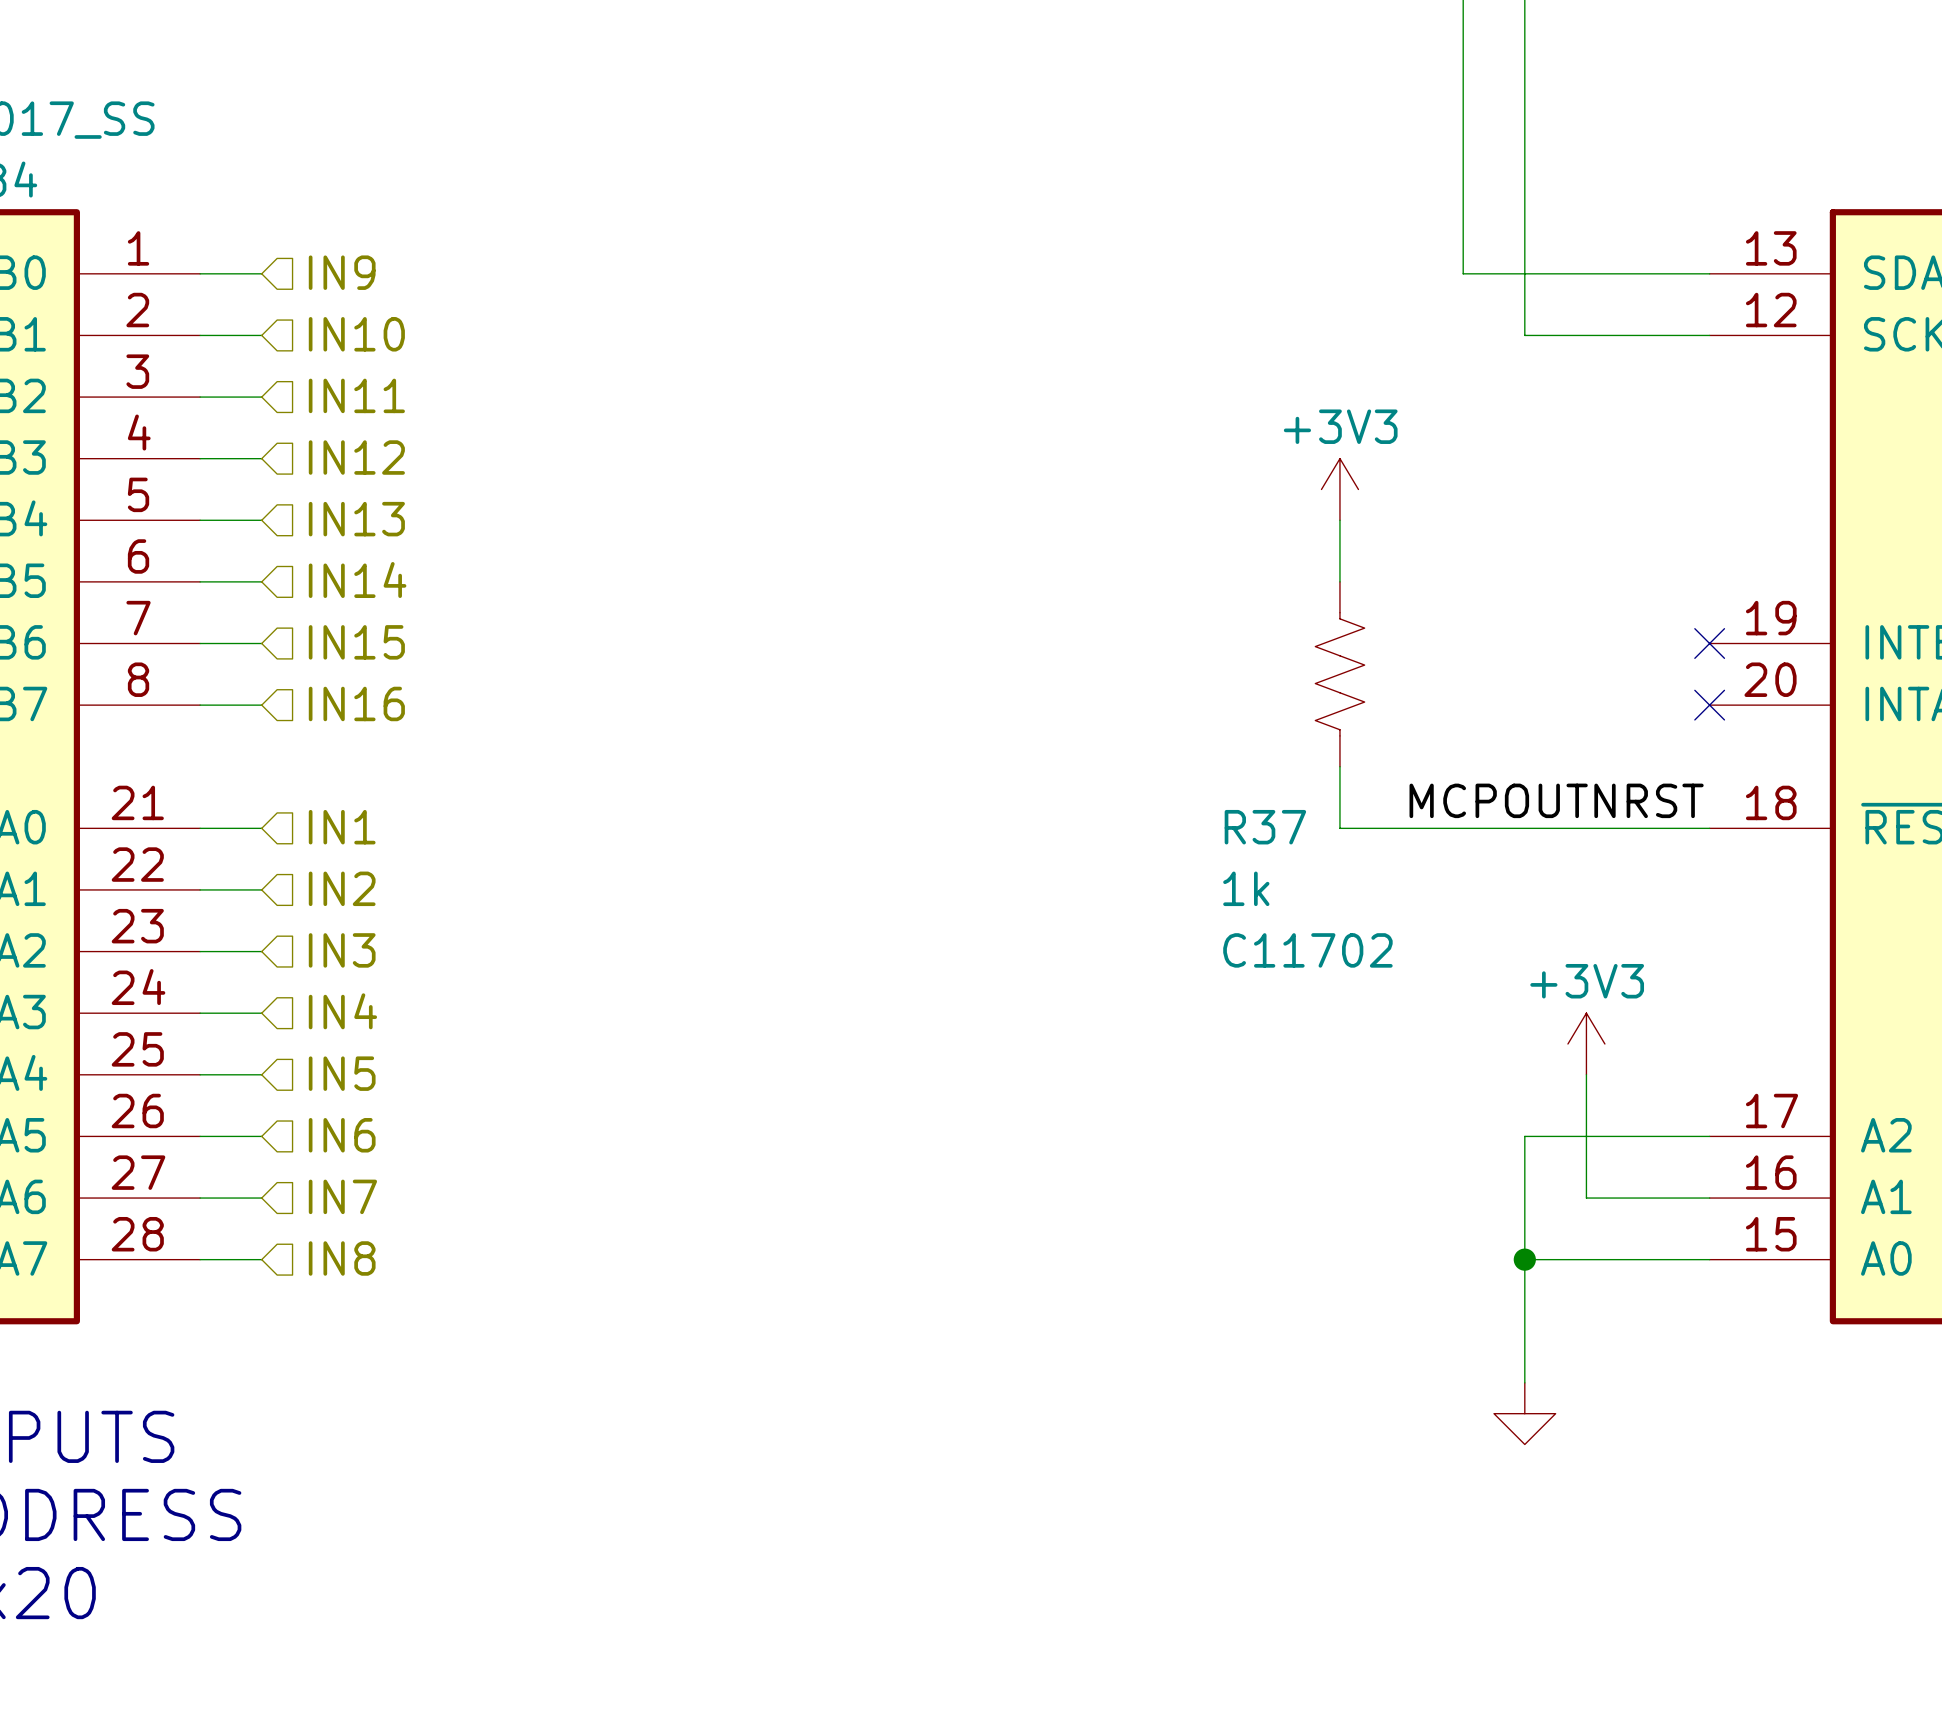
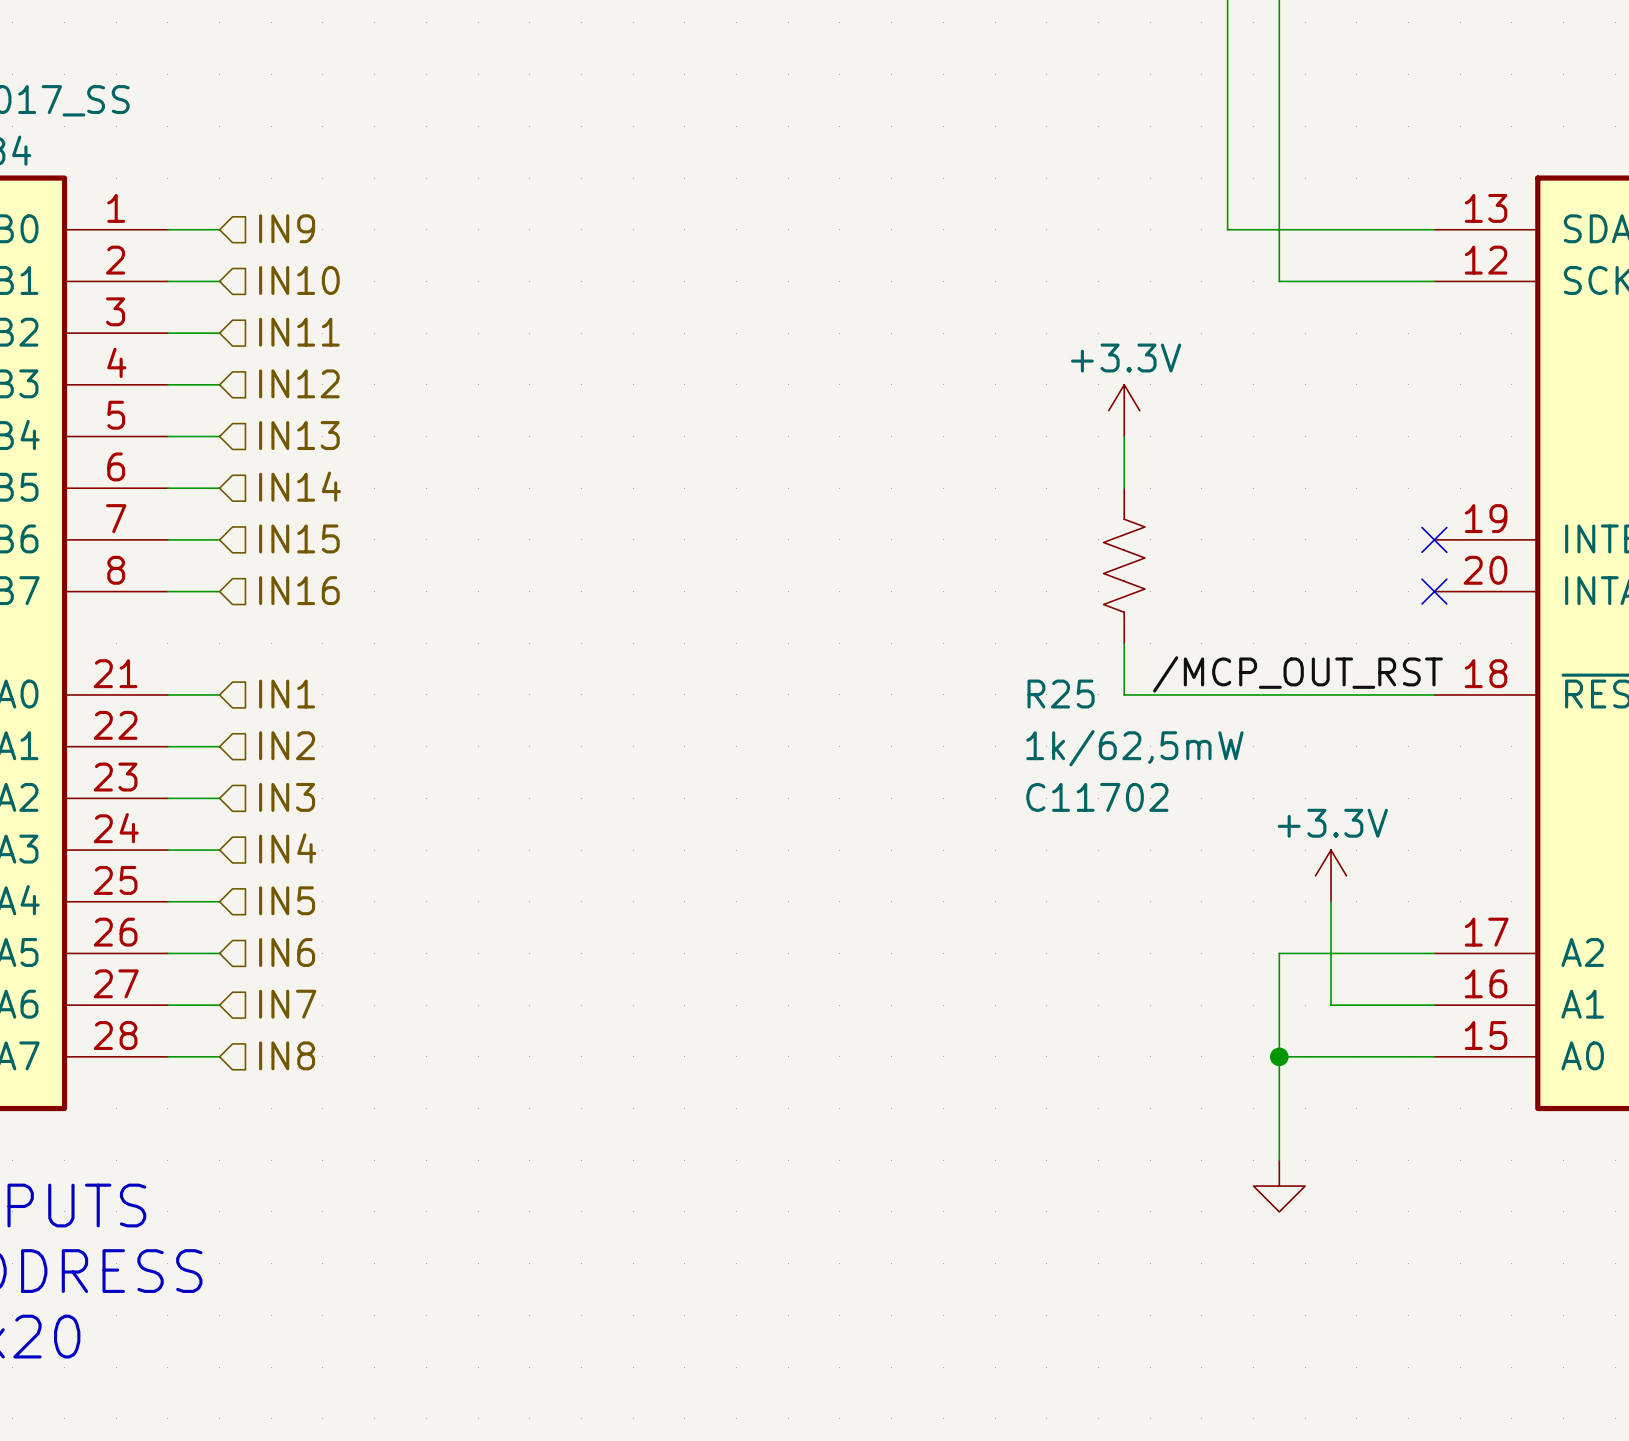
power symbol: +3V3 (1339, 489) -> +3.3V (1124, 410)
label: MCPOUTNRST (1556, 800) -> /MCP_OUT_RST (1297, 674)
R37 name: R37 (1265, 827) -> R25 (1061, 694)
R37 value: 1k (1246, 888) -> 1k/62,5mW (1134, 748)
power symbol: +3V3 (1586, 1043) -> +3.3V (1331, 875)

